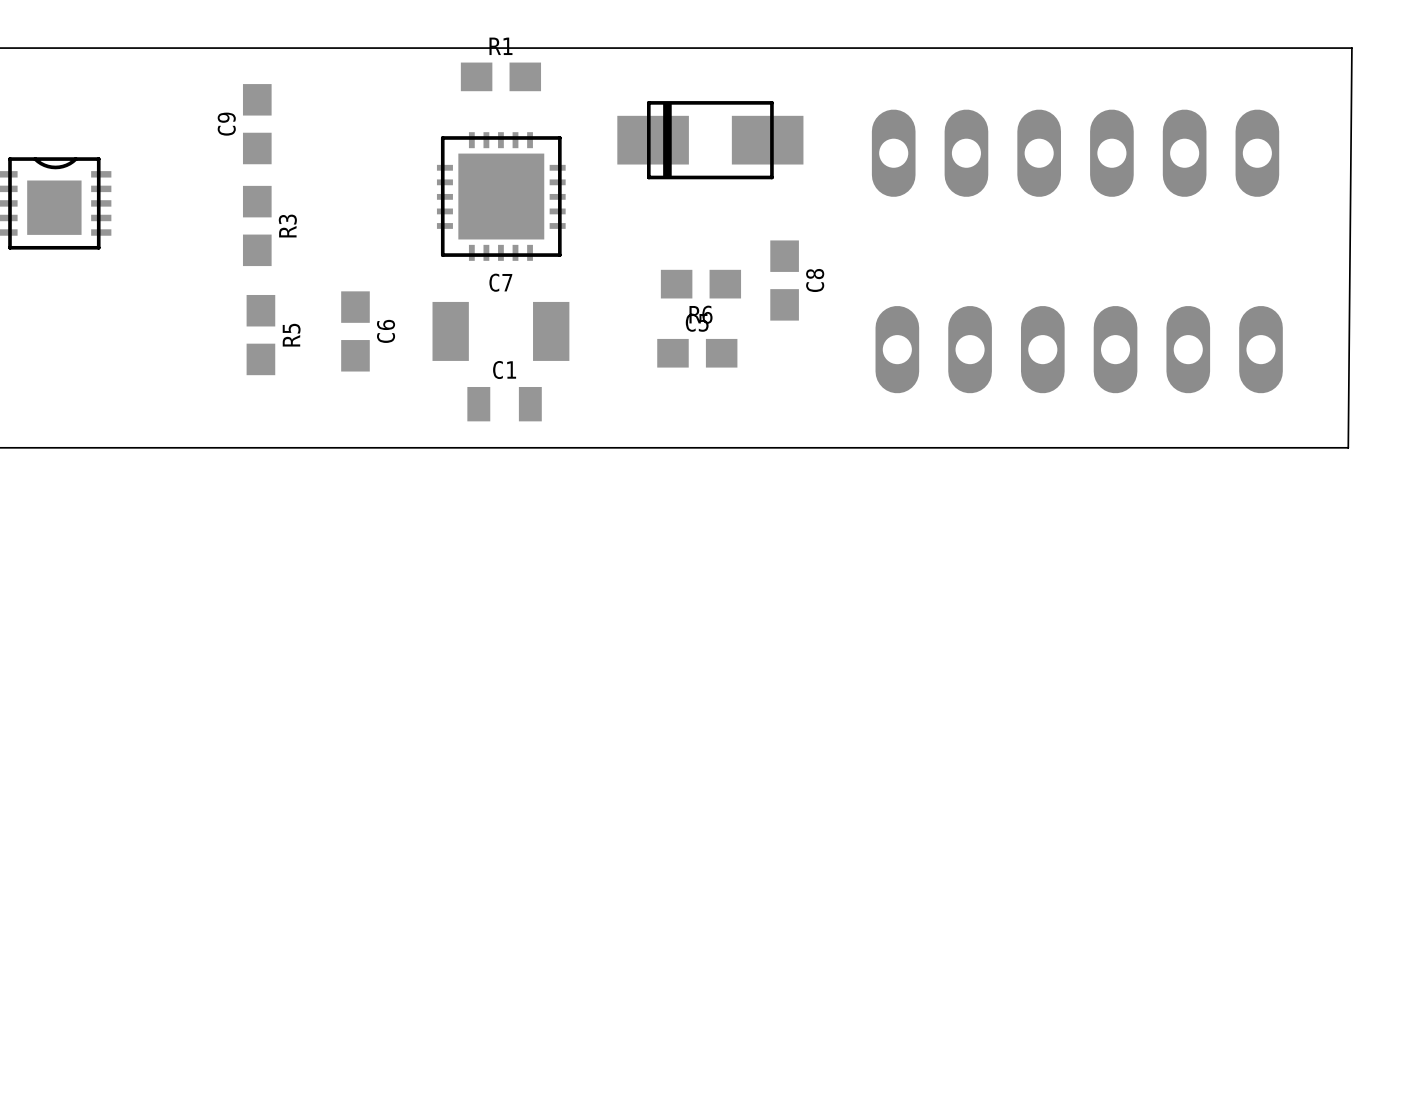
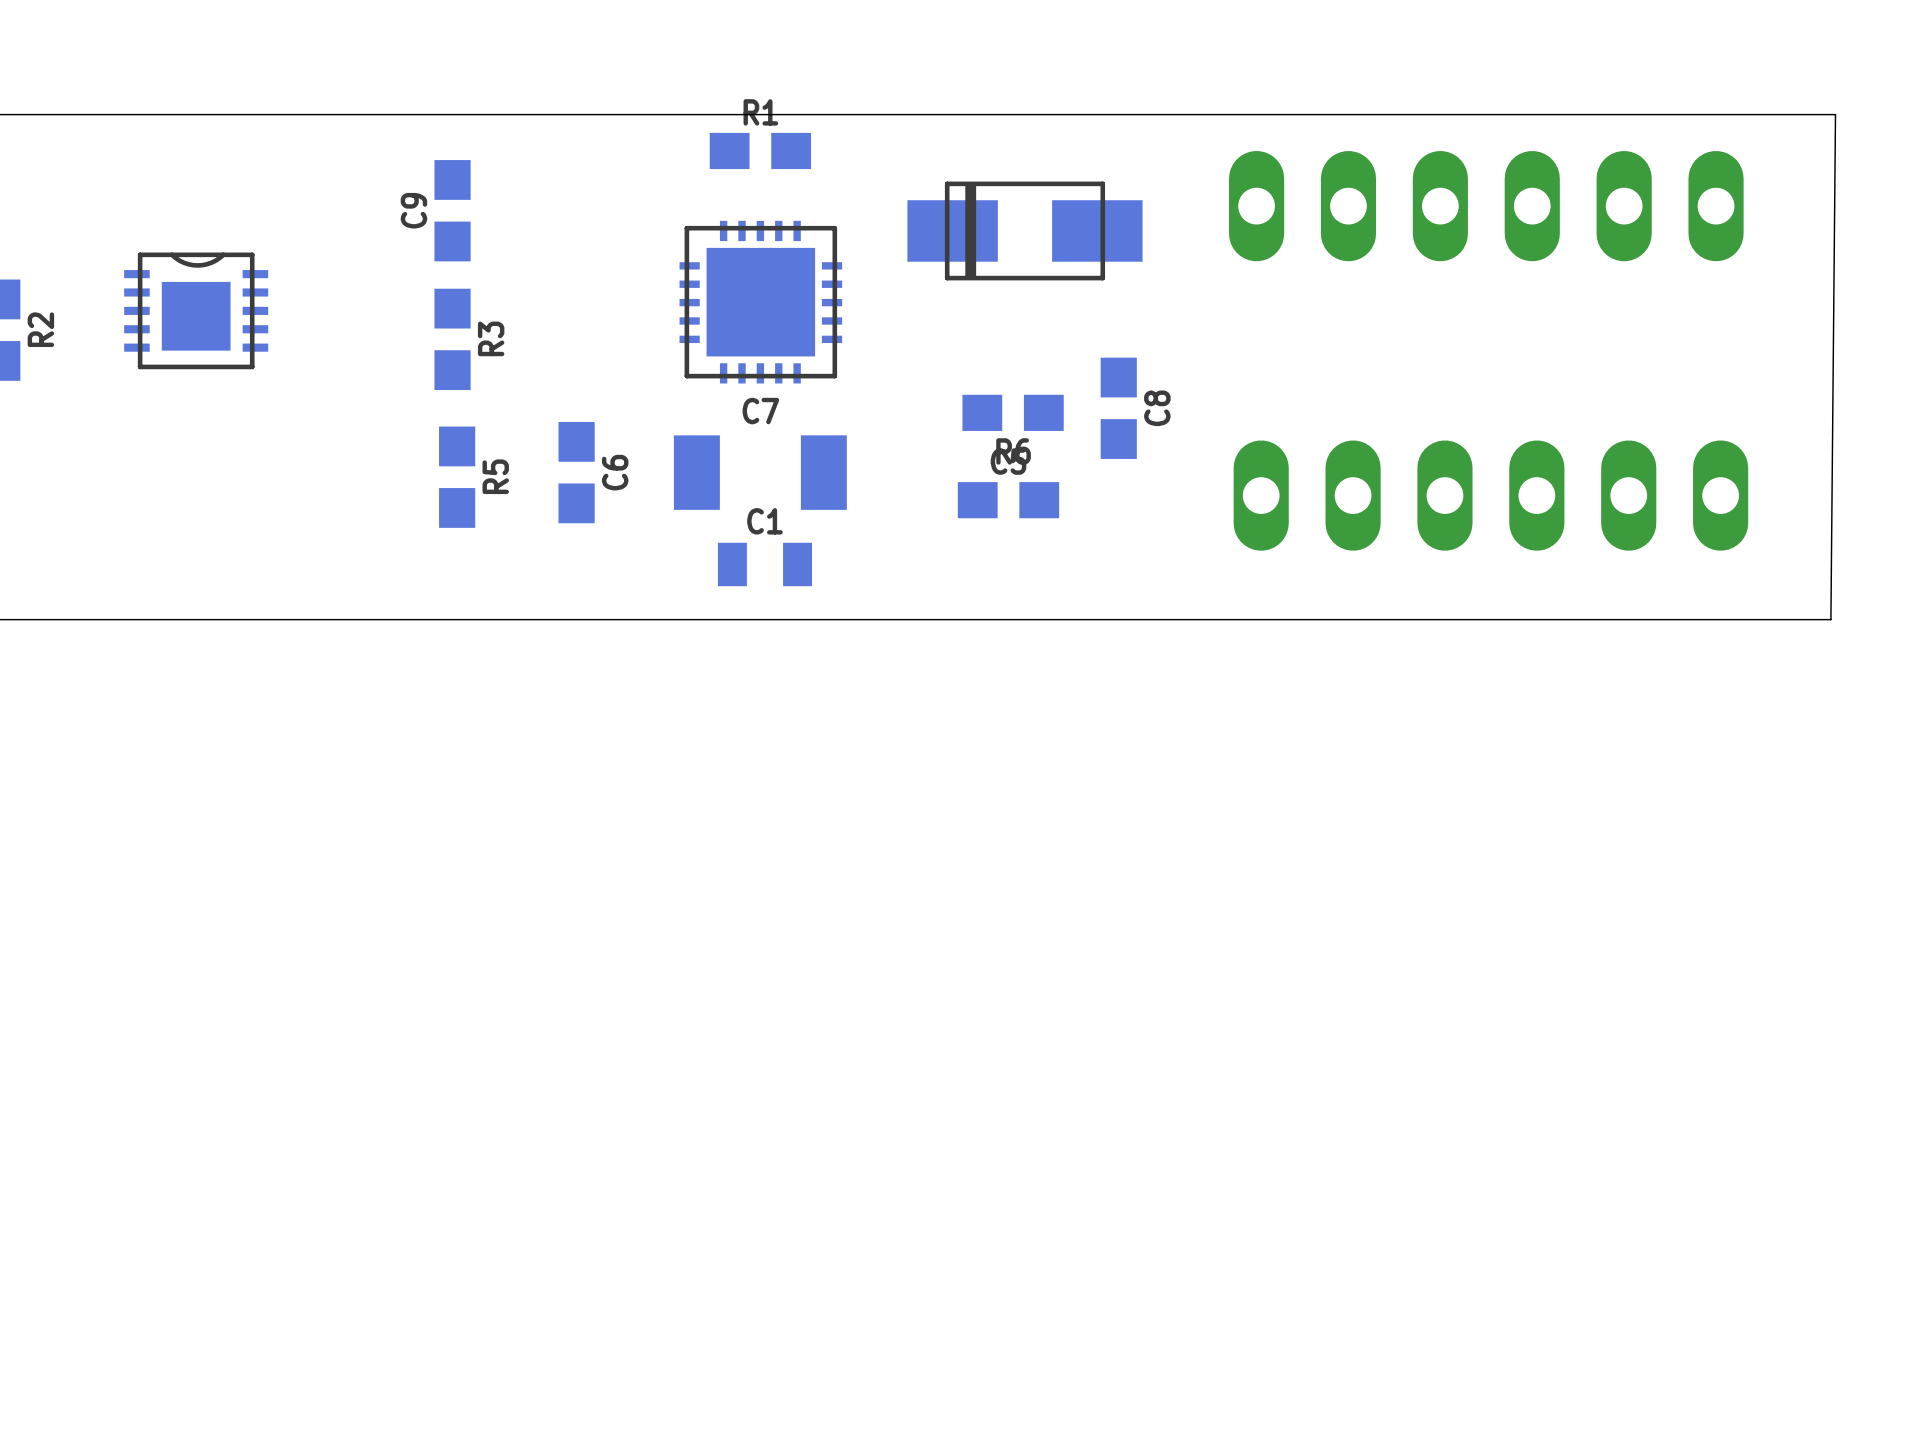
part position: (1075, 153) -> (1486, 206)

